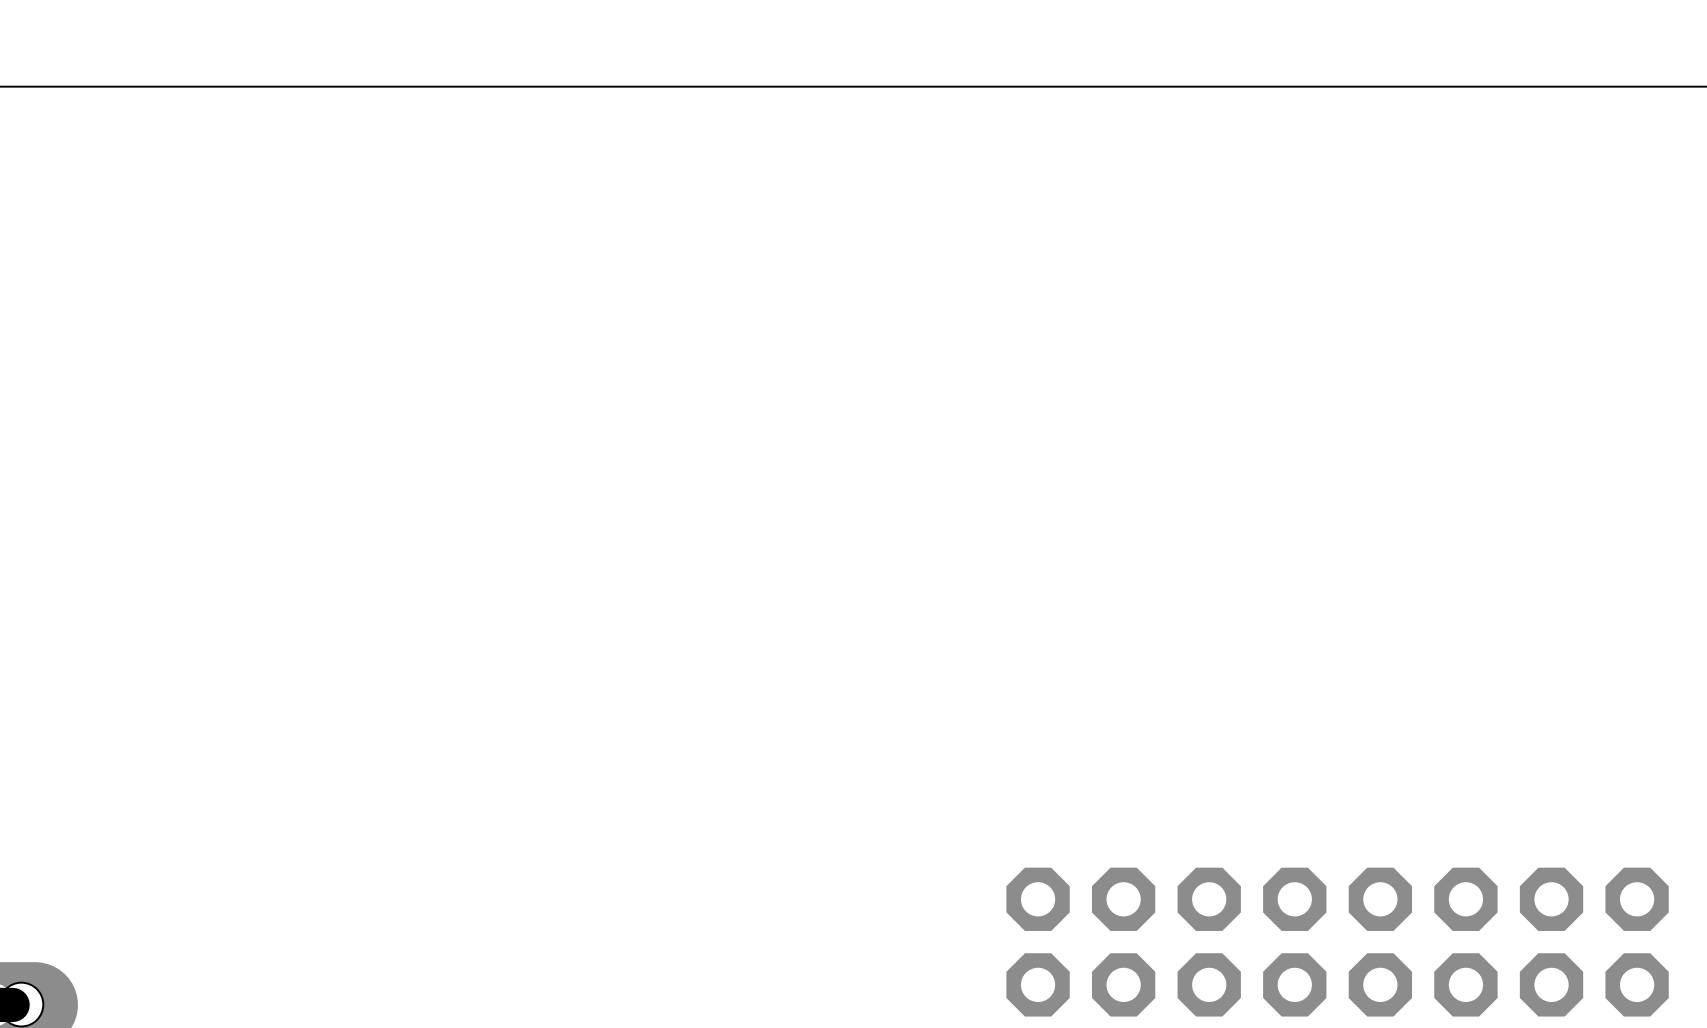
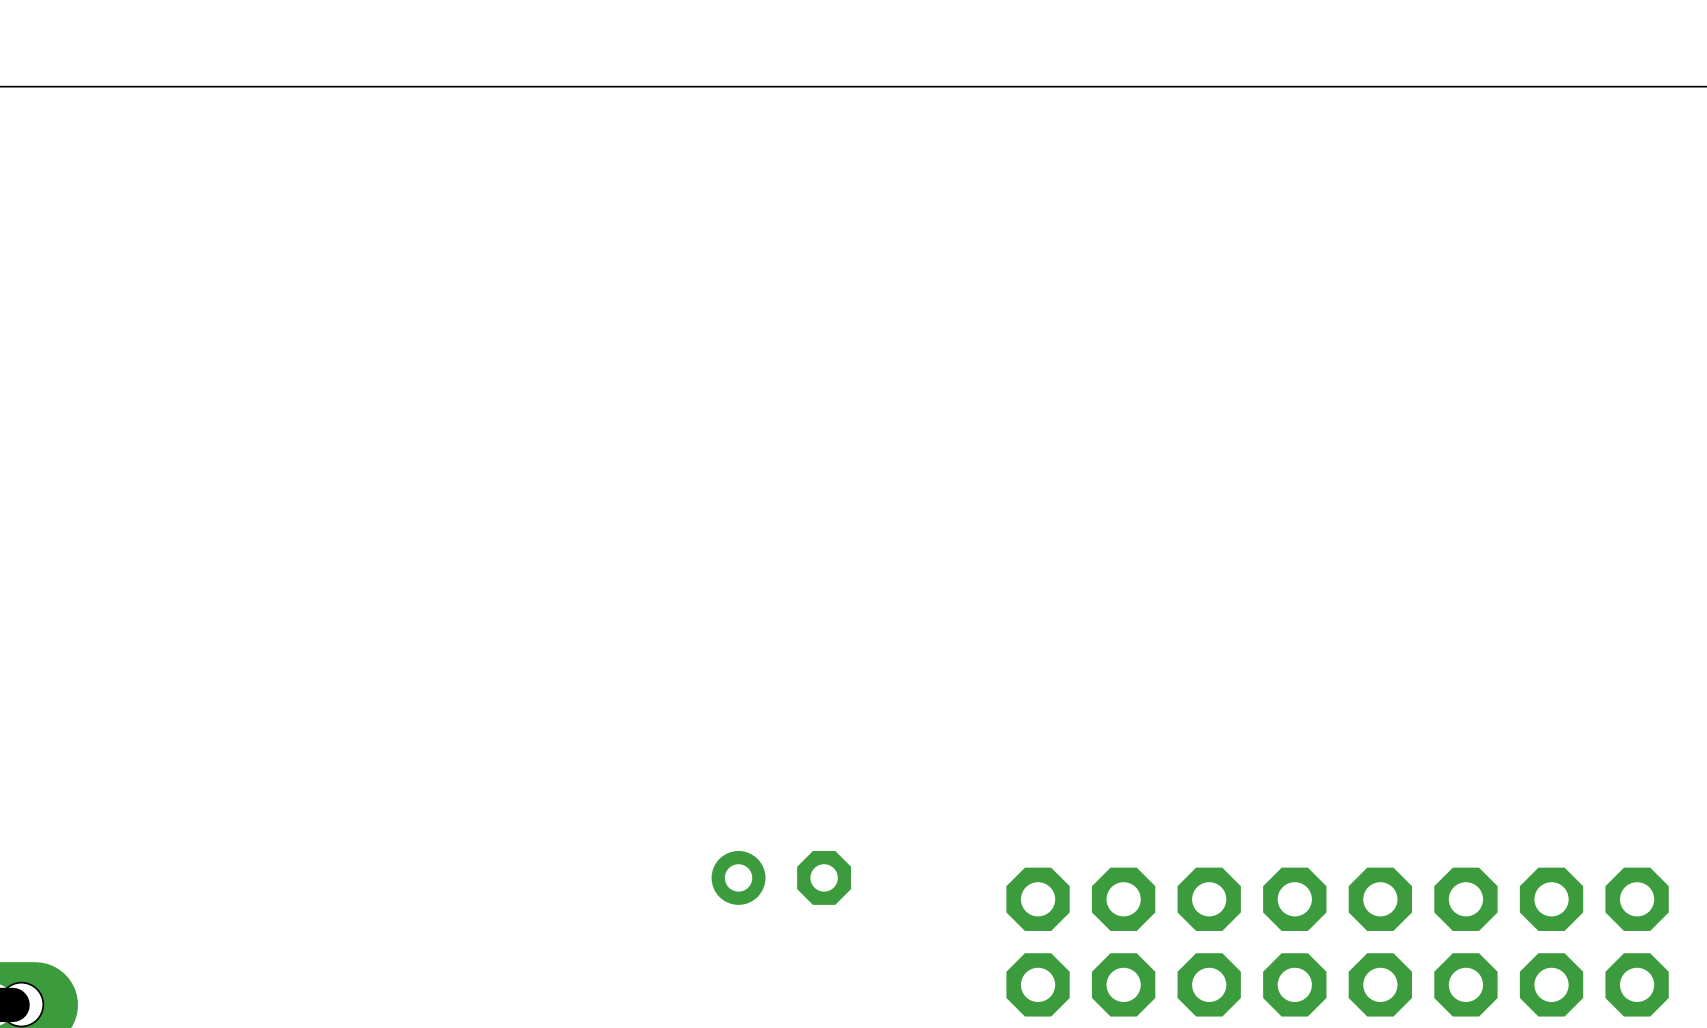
part: none -> (781, 877)

